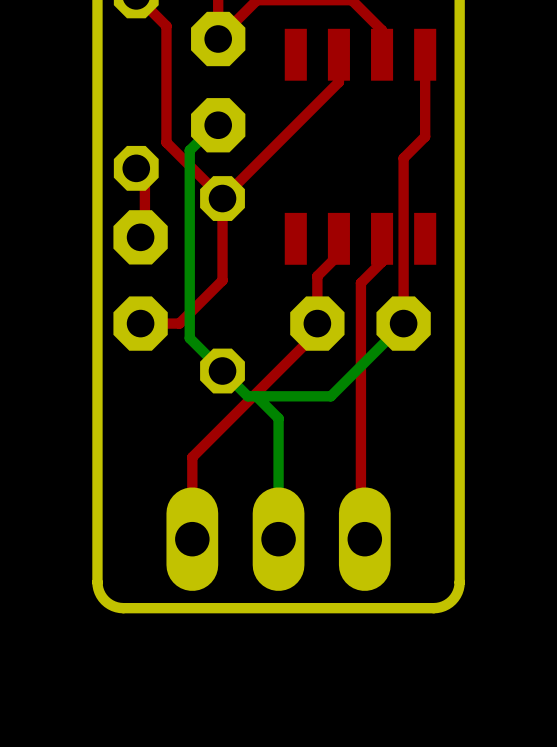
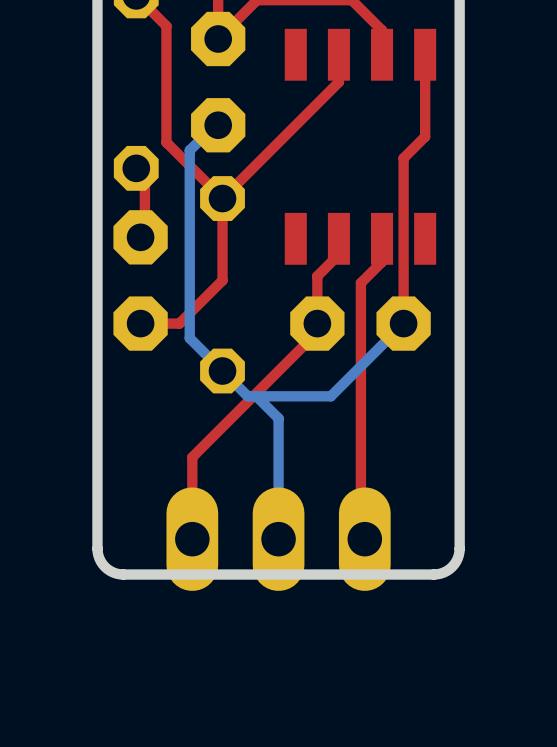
board edge: (459, 548) (459, 582) (457, 592) (446, 604) (433, 608) (119, 607) (107, 602) (99, 592) (97, 582) (97, 548) -> (459, 548) (457, 558) (452, 566) (443, 572) (433, 574) (119, 574) (110, 571) (102, 564) (97, 548)

